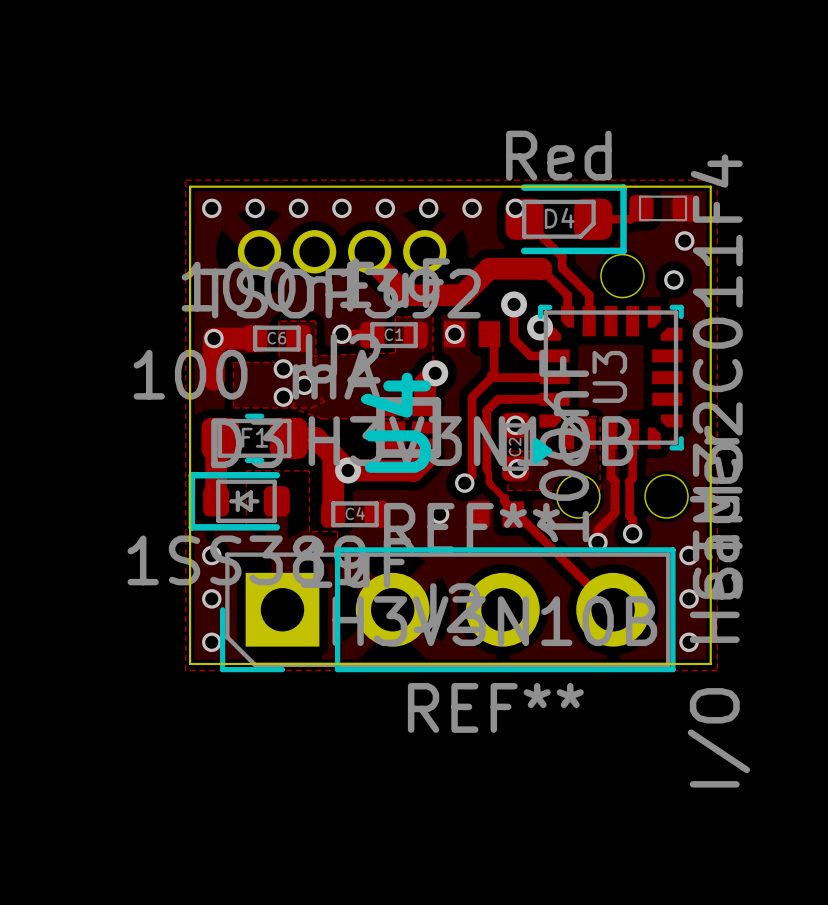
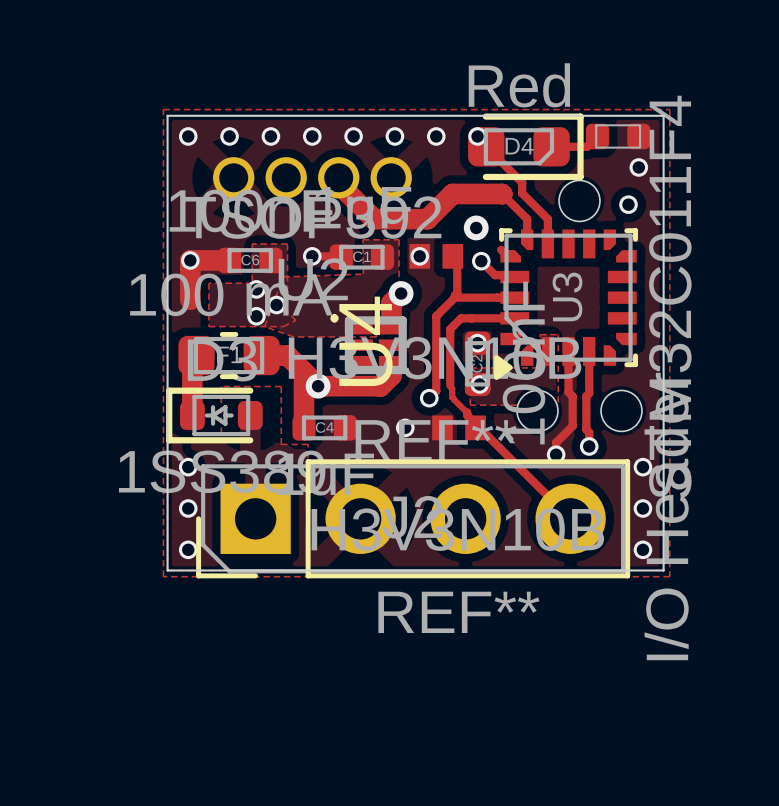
track: (513, 304) (513, 339) (530, 355) (554, 355) -> (487, 267) (495, 275) (514, 275) (514, 277)
via position: (540, 327) -> (481, 261)

